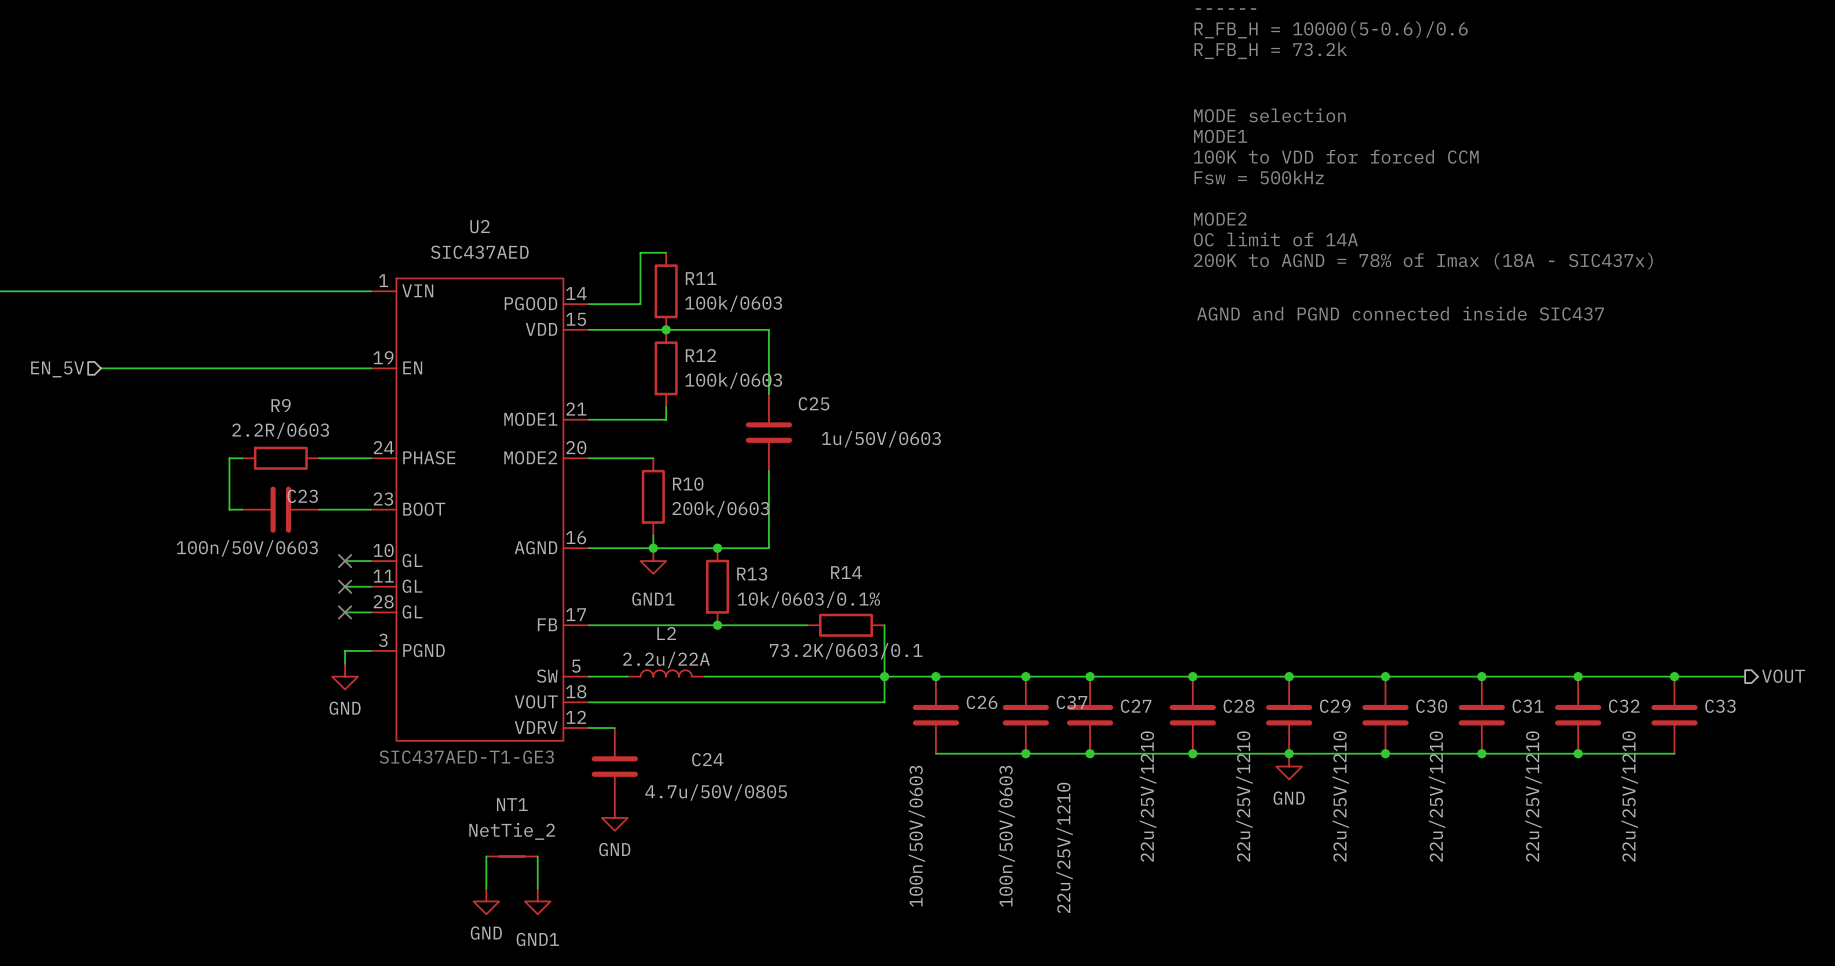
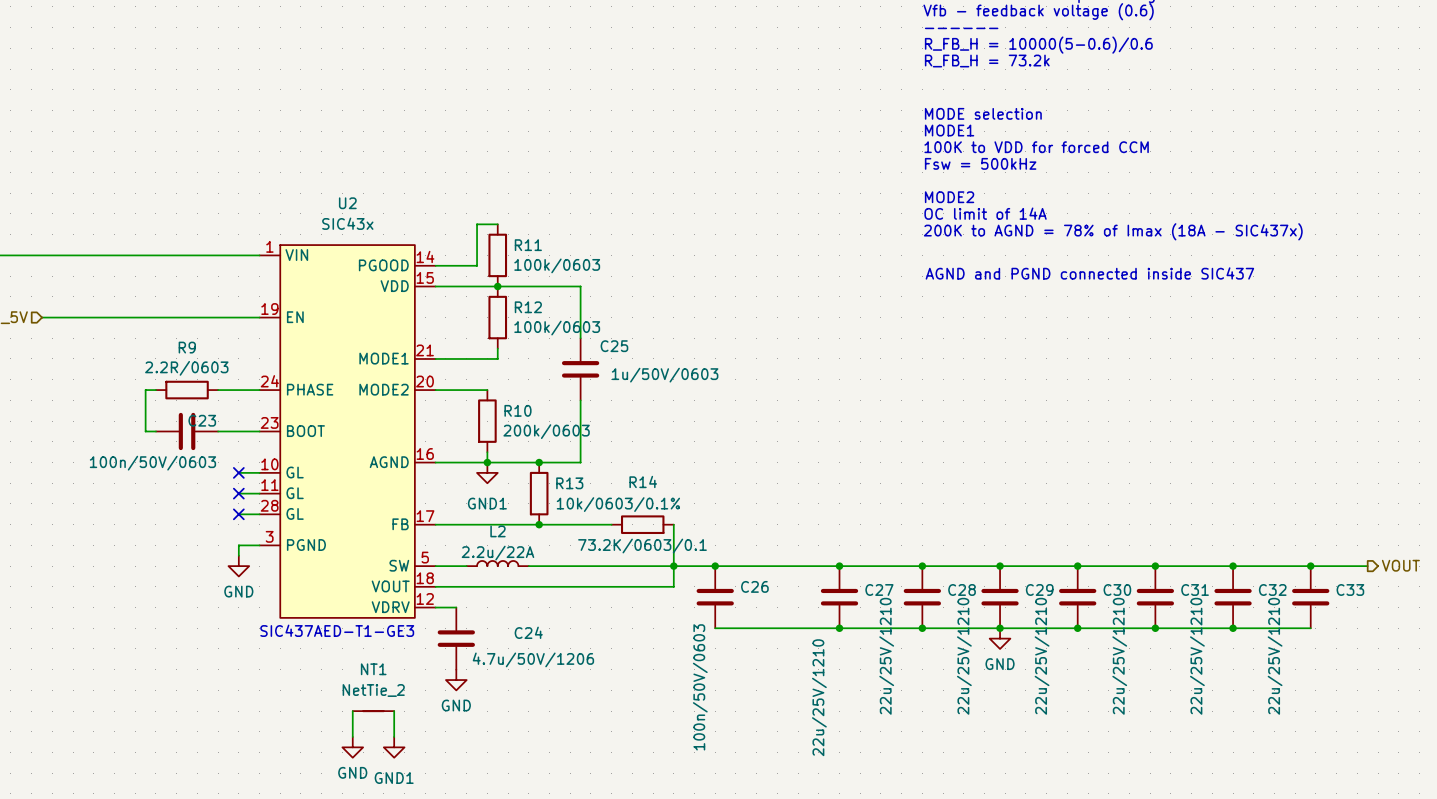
U2 value: SIC437AED (479, 252) -> SIC43x (347, 223)
junction: (1025, 676) -> none
C37: 100n/50V/0603 (1025, 715) -> none
junction: (1025, 753) -> none
C24 value: 4.7u/50V/0805 (716, 792) -> 4.7u/50V/1206 (533, 659)

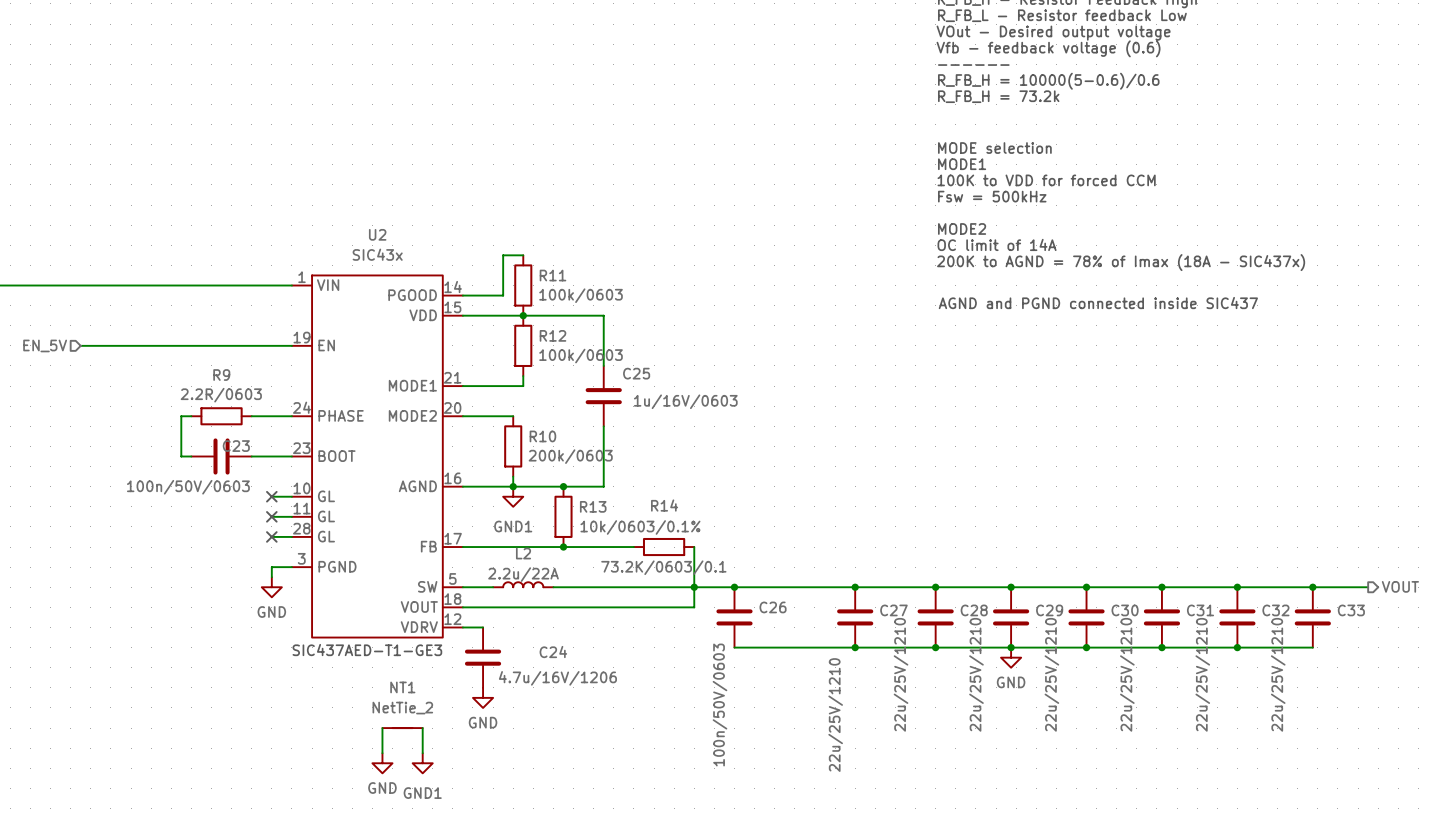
C25 value: 1u/50V/0603 (665, 375) -> 1u/16V/0603 (685, 401)
C24 value: 4.7u/50V/1206 (533, 659) -> 4.7u/16V/1206 (557, 678)

